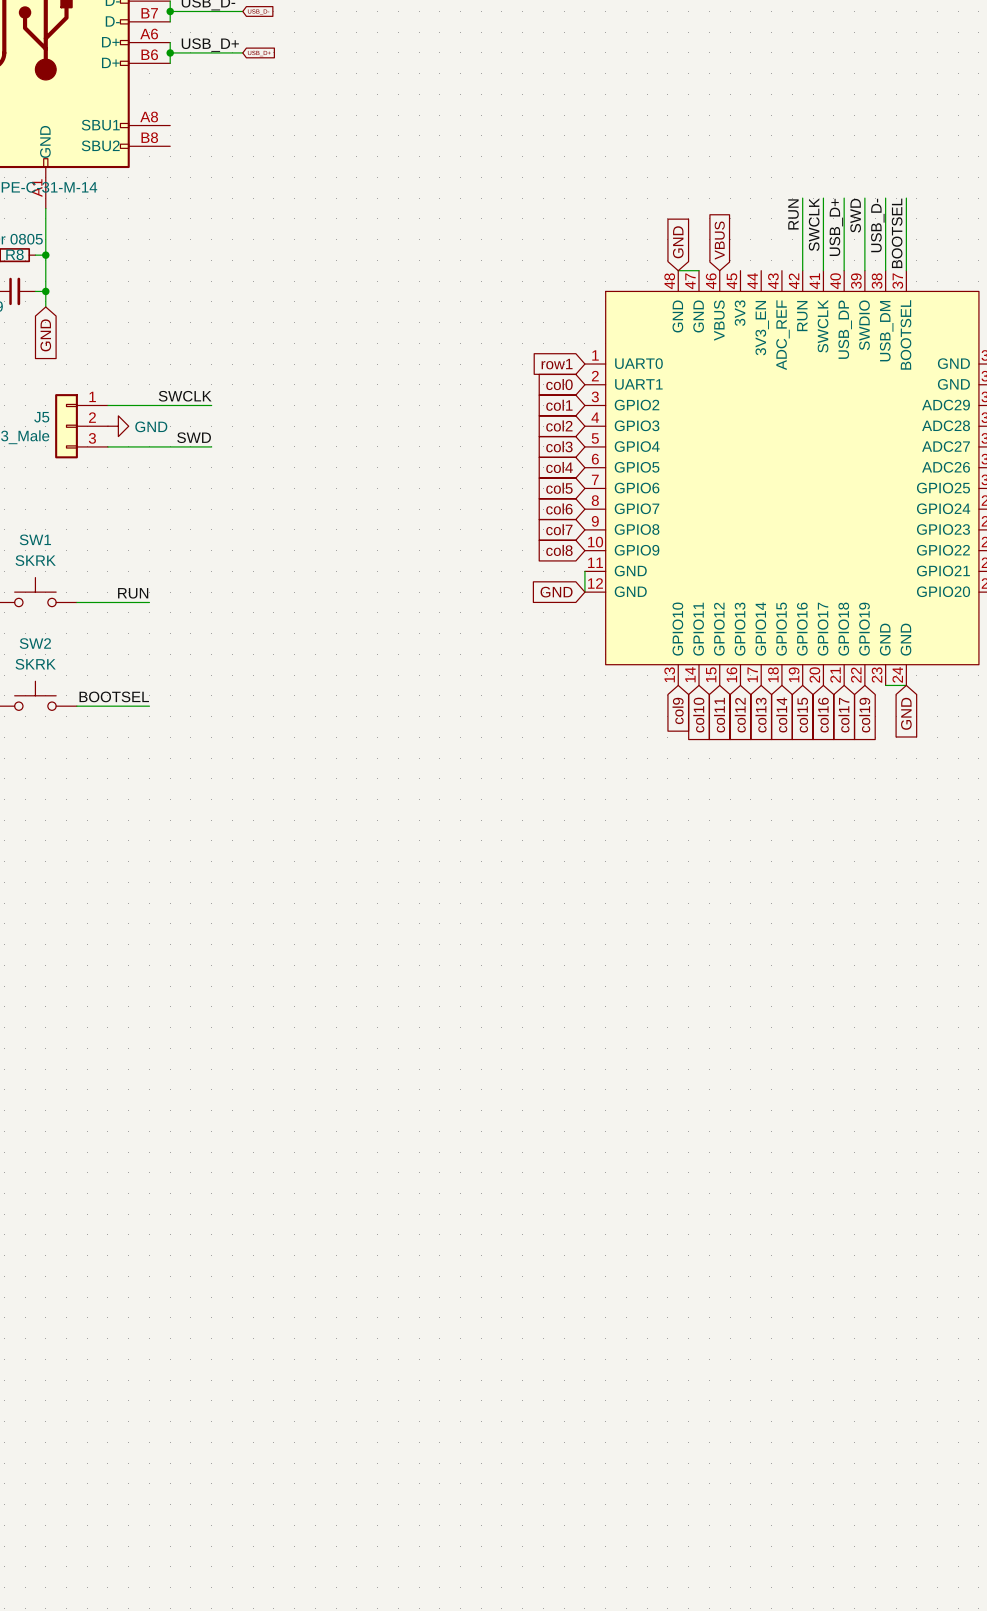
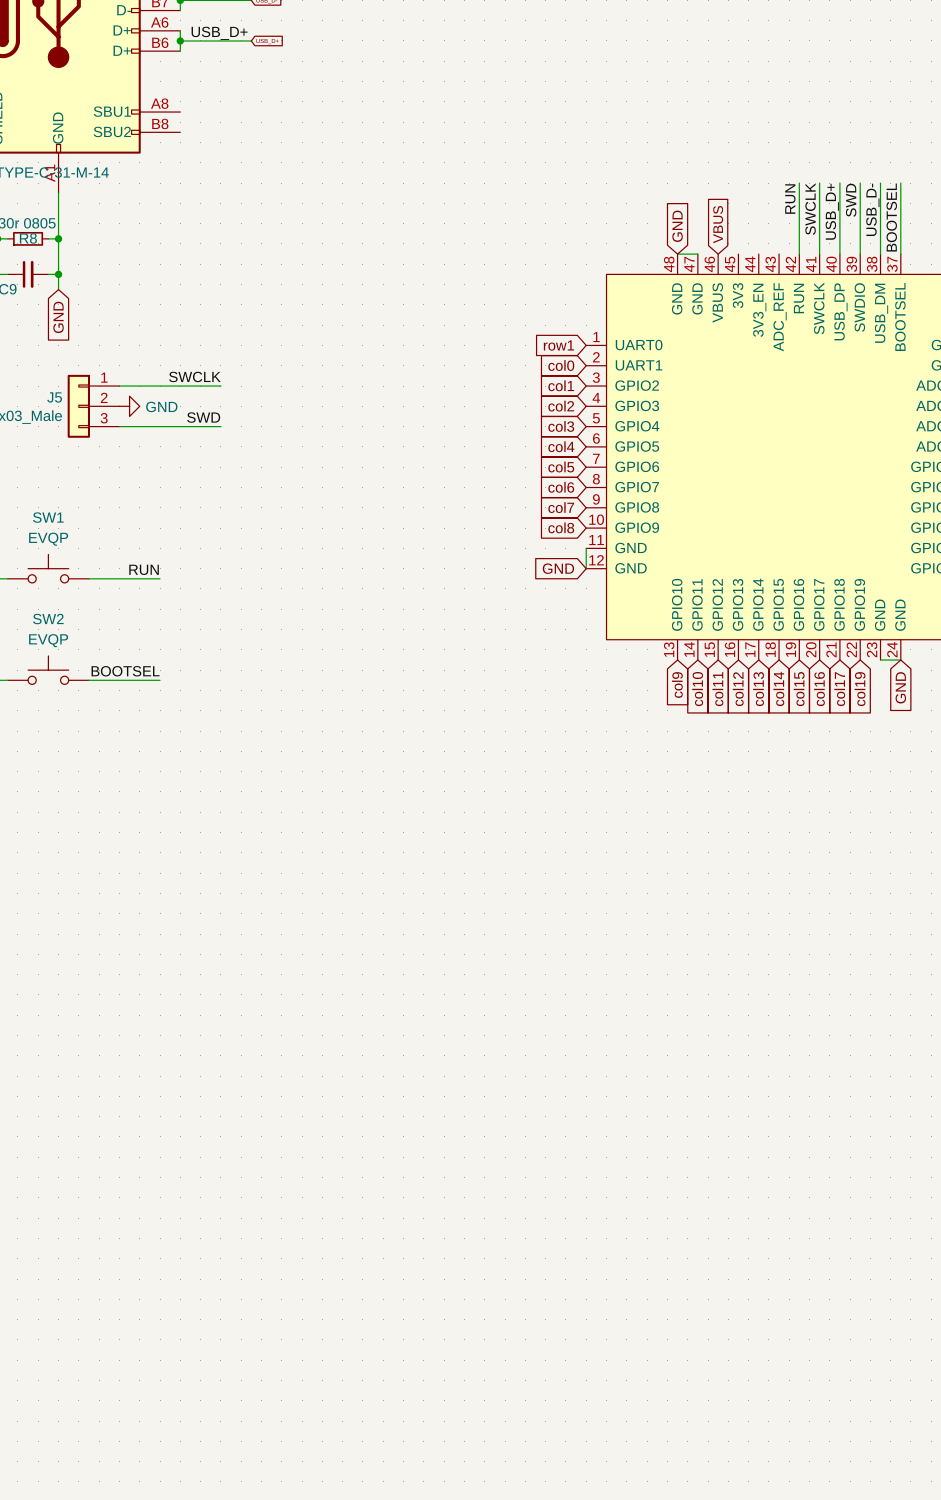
SW1 value: SKRK (35, 560) -> EVQP (48, 539)
SW2 value: SKRK (35, 664) -> EVQP (48, 640)

